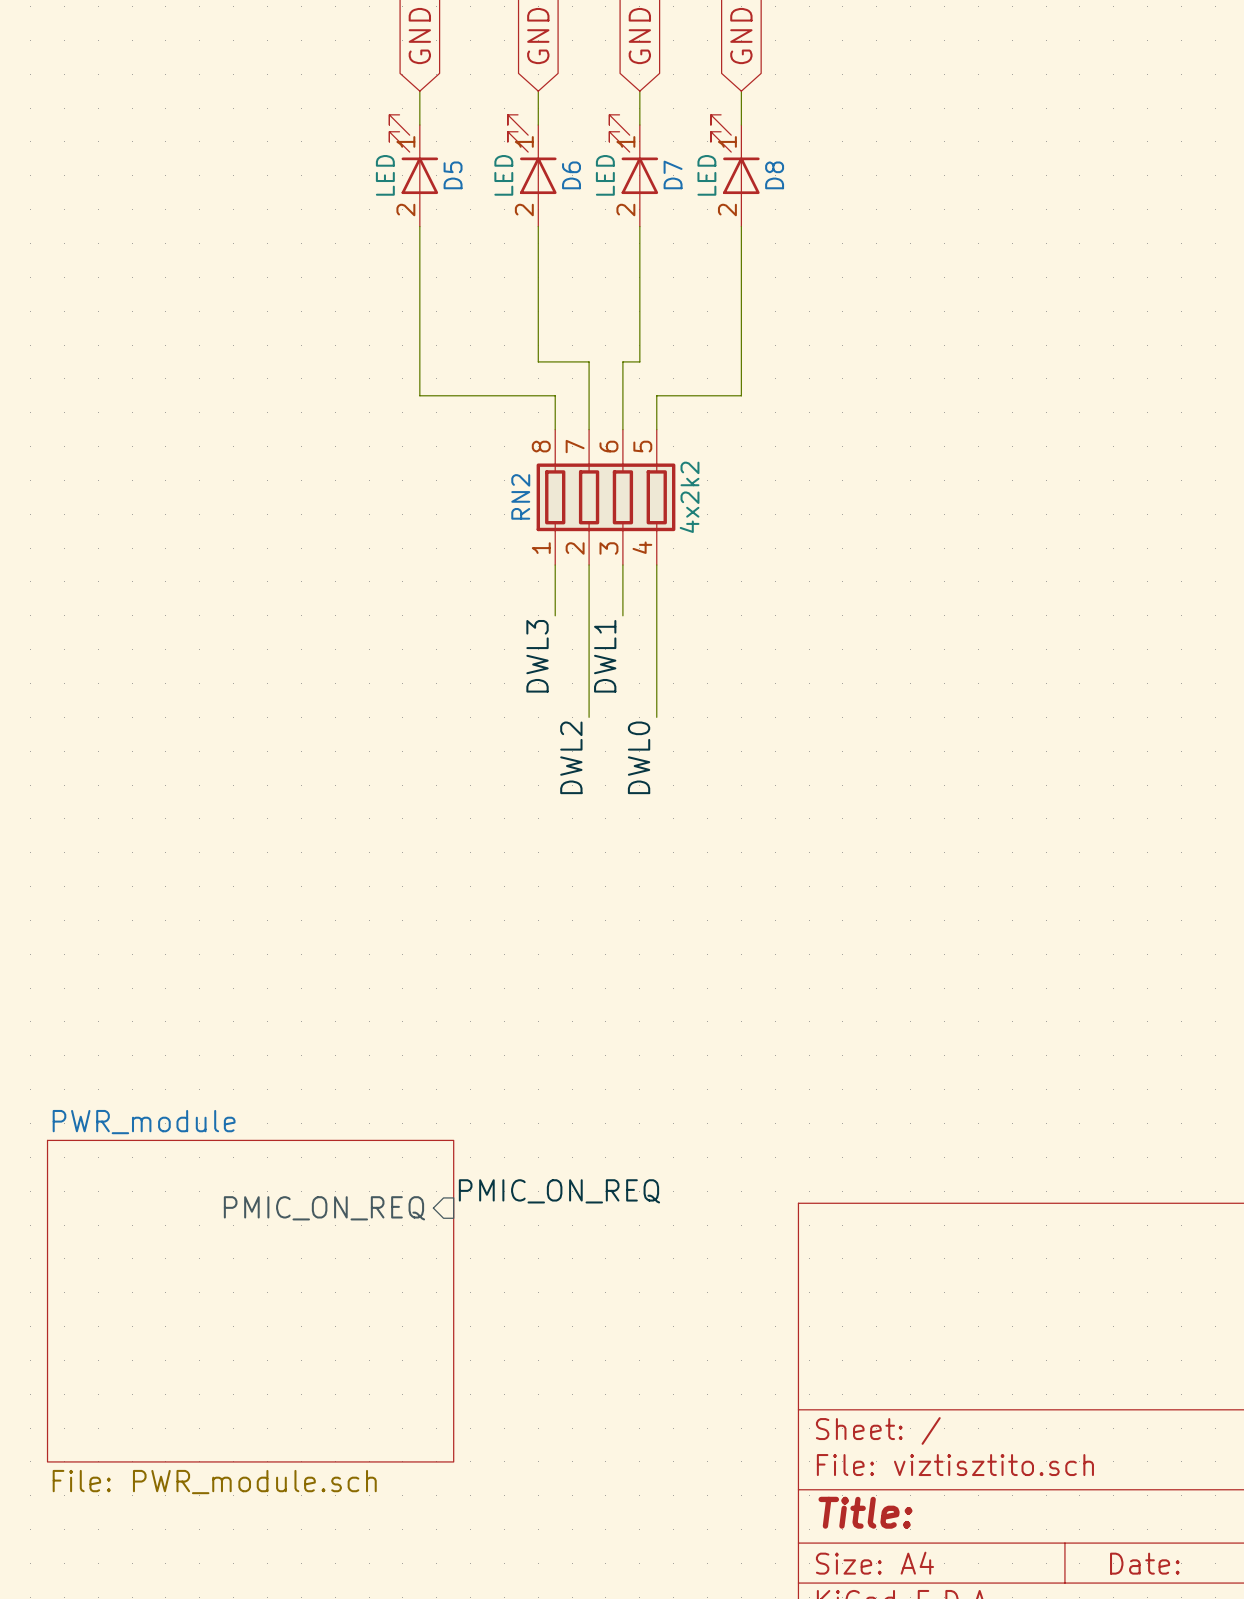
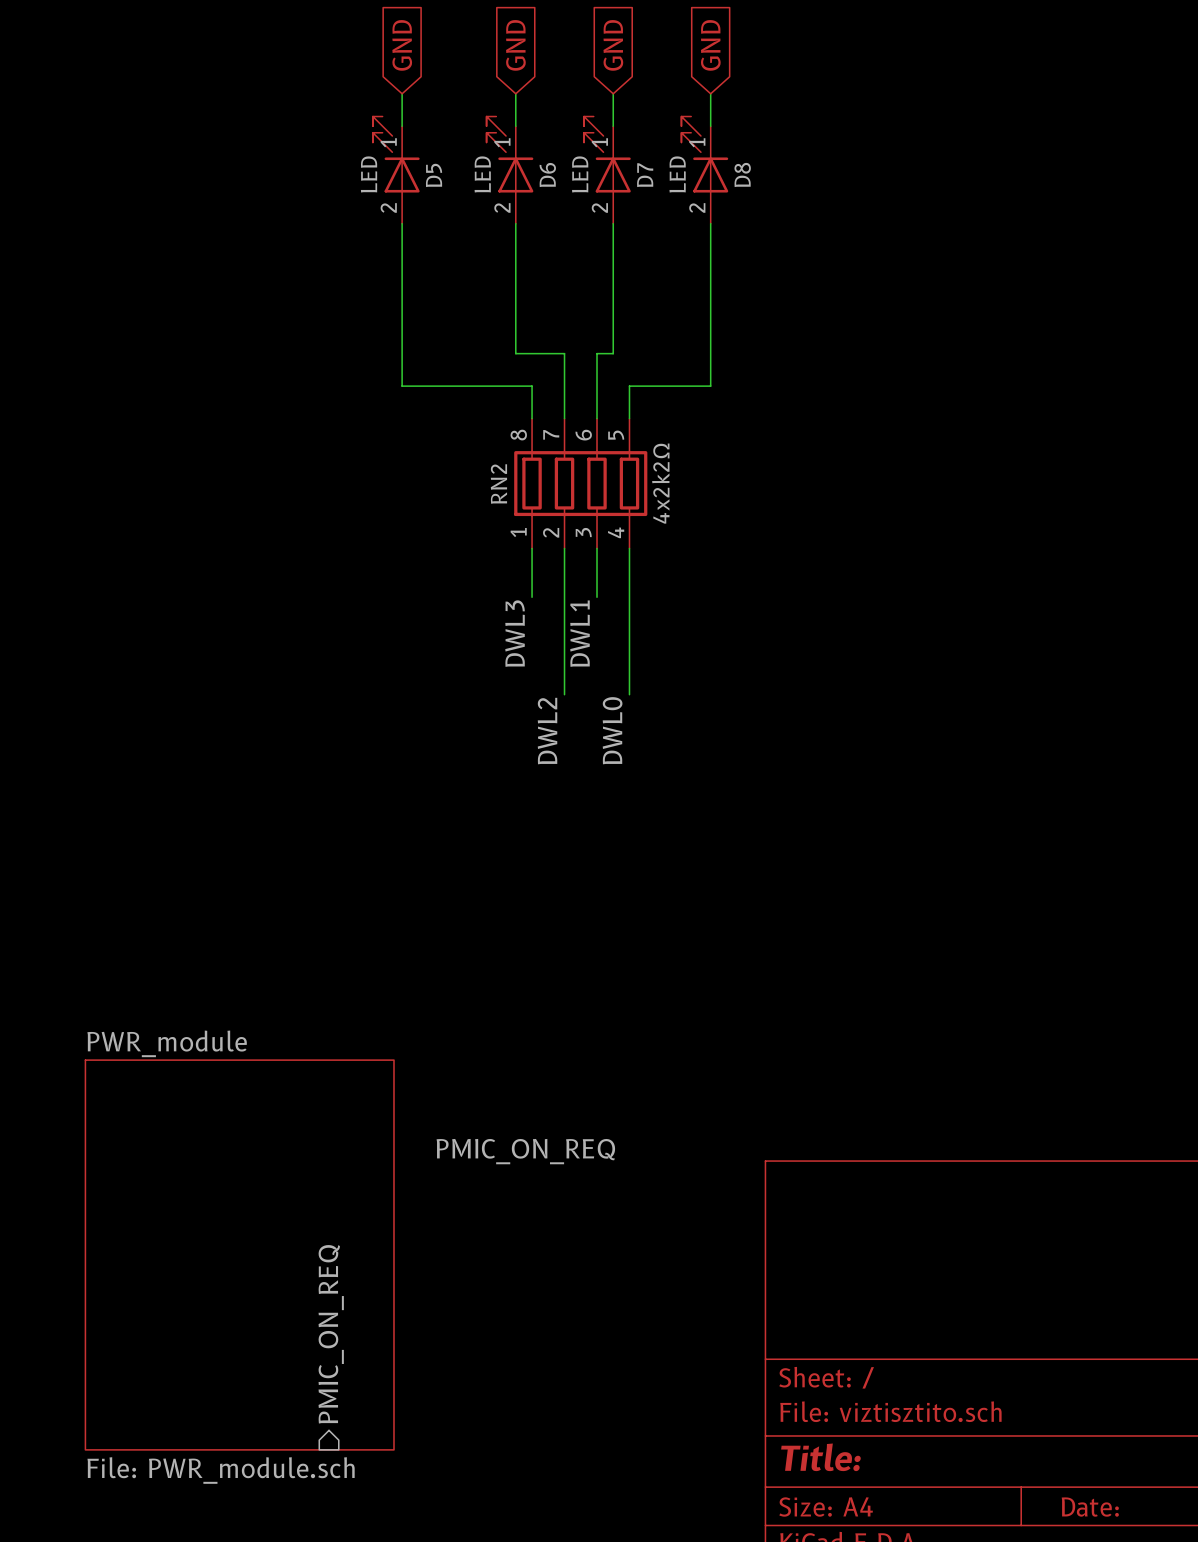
RN2 value: 4x2k2 (689, 497) -> 4x2k2Ω (660, 483)
sheet PWR_module name position: PWR_module (144, 1122) -> PWR_module (167, 1043)
sheet pin rotation: 0° (324, 1208) -> 90° clockwise (331, 1334)
sheet PWR_module rotation: 0° (250, 1301) -> 90° clockwise (239, 1255)
sheet PWR_module value position: File: PWR_module.sch (214, 1482) -> File: PWR_module.sch (221, 1470)

